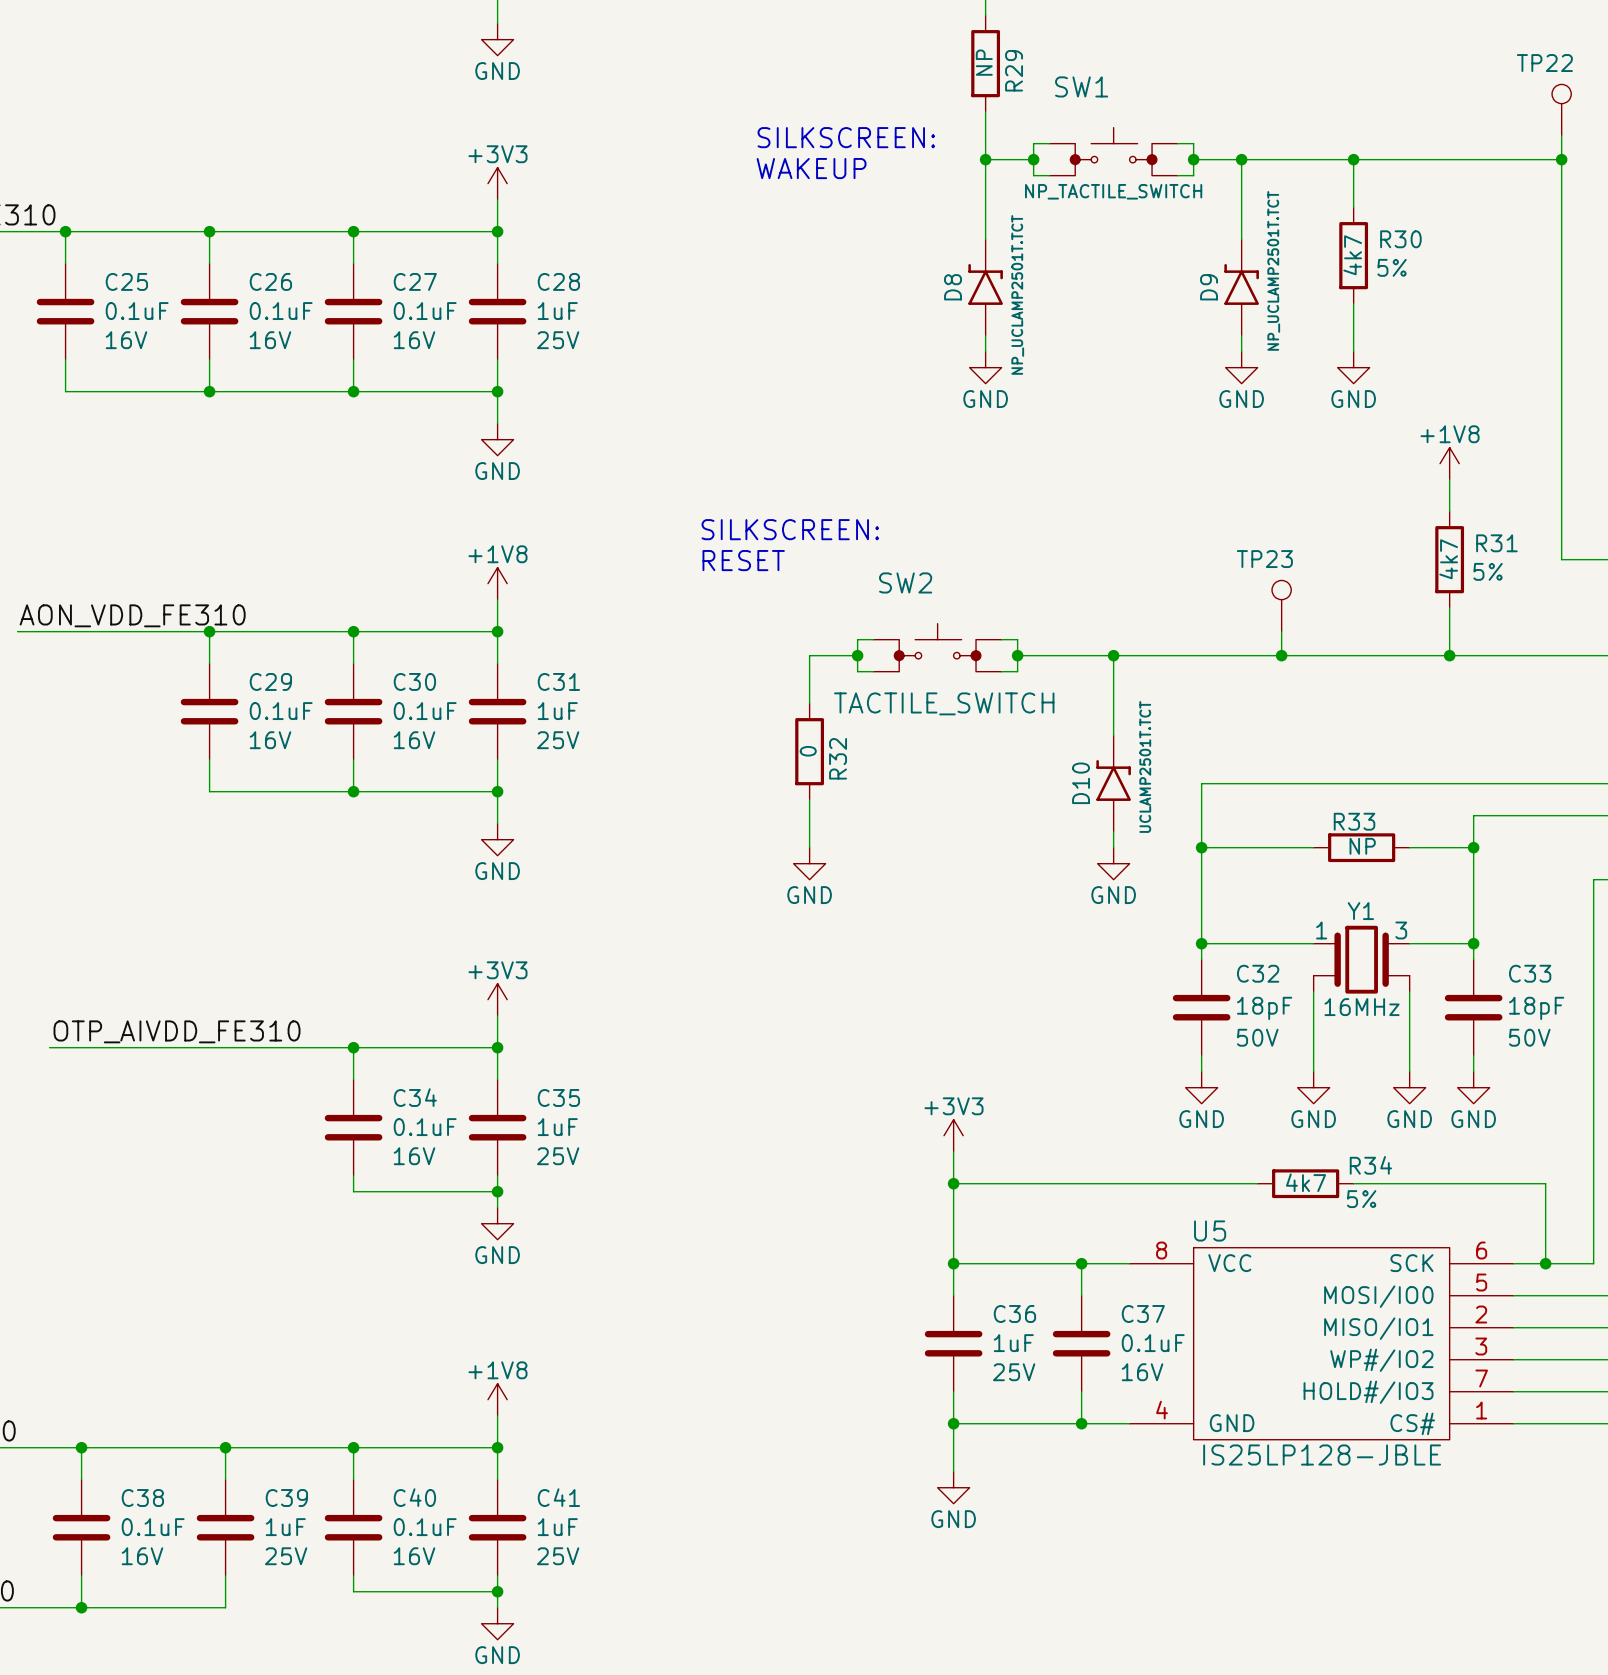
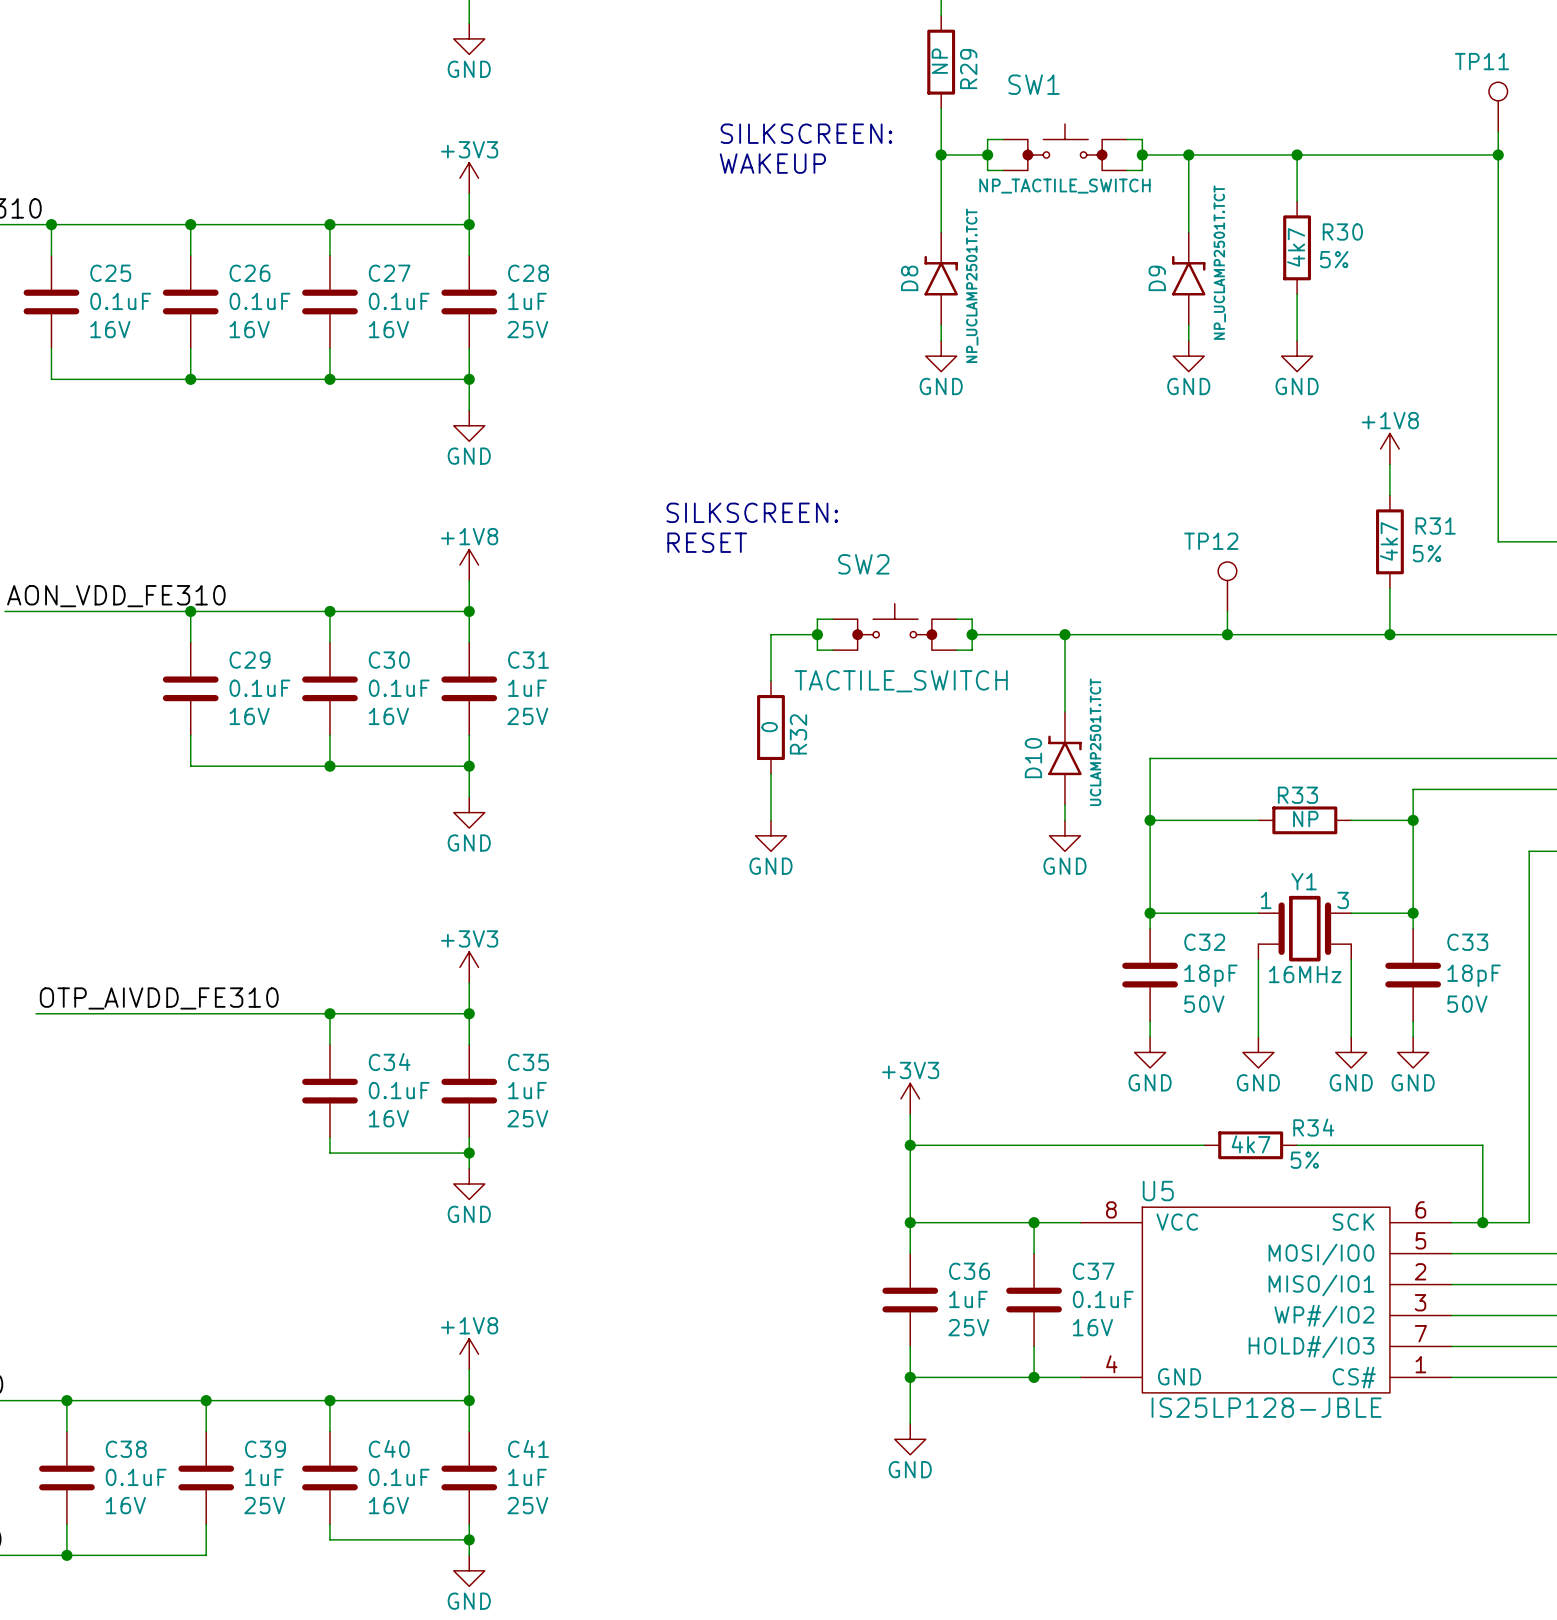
TP22 name: TP22 (1544, 63) -> TP11 (1482, 61)
TP23 name: TP23 (1264, 559) -> TP12 (1211, 541)

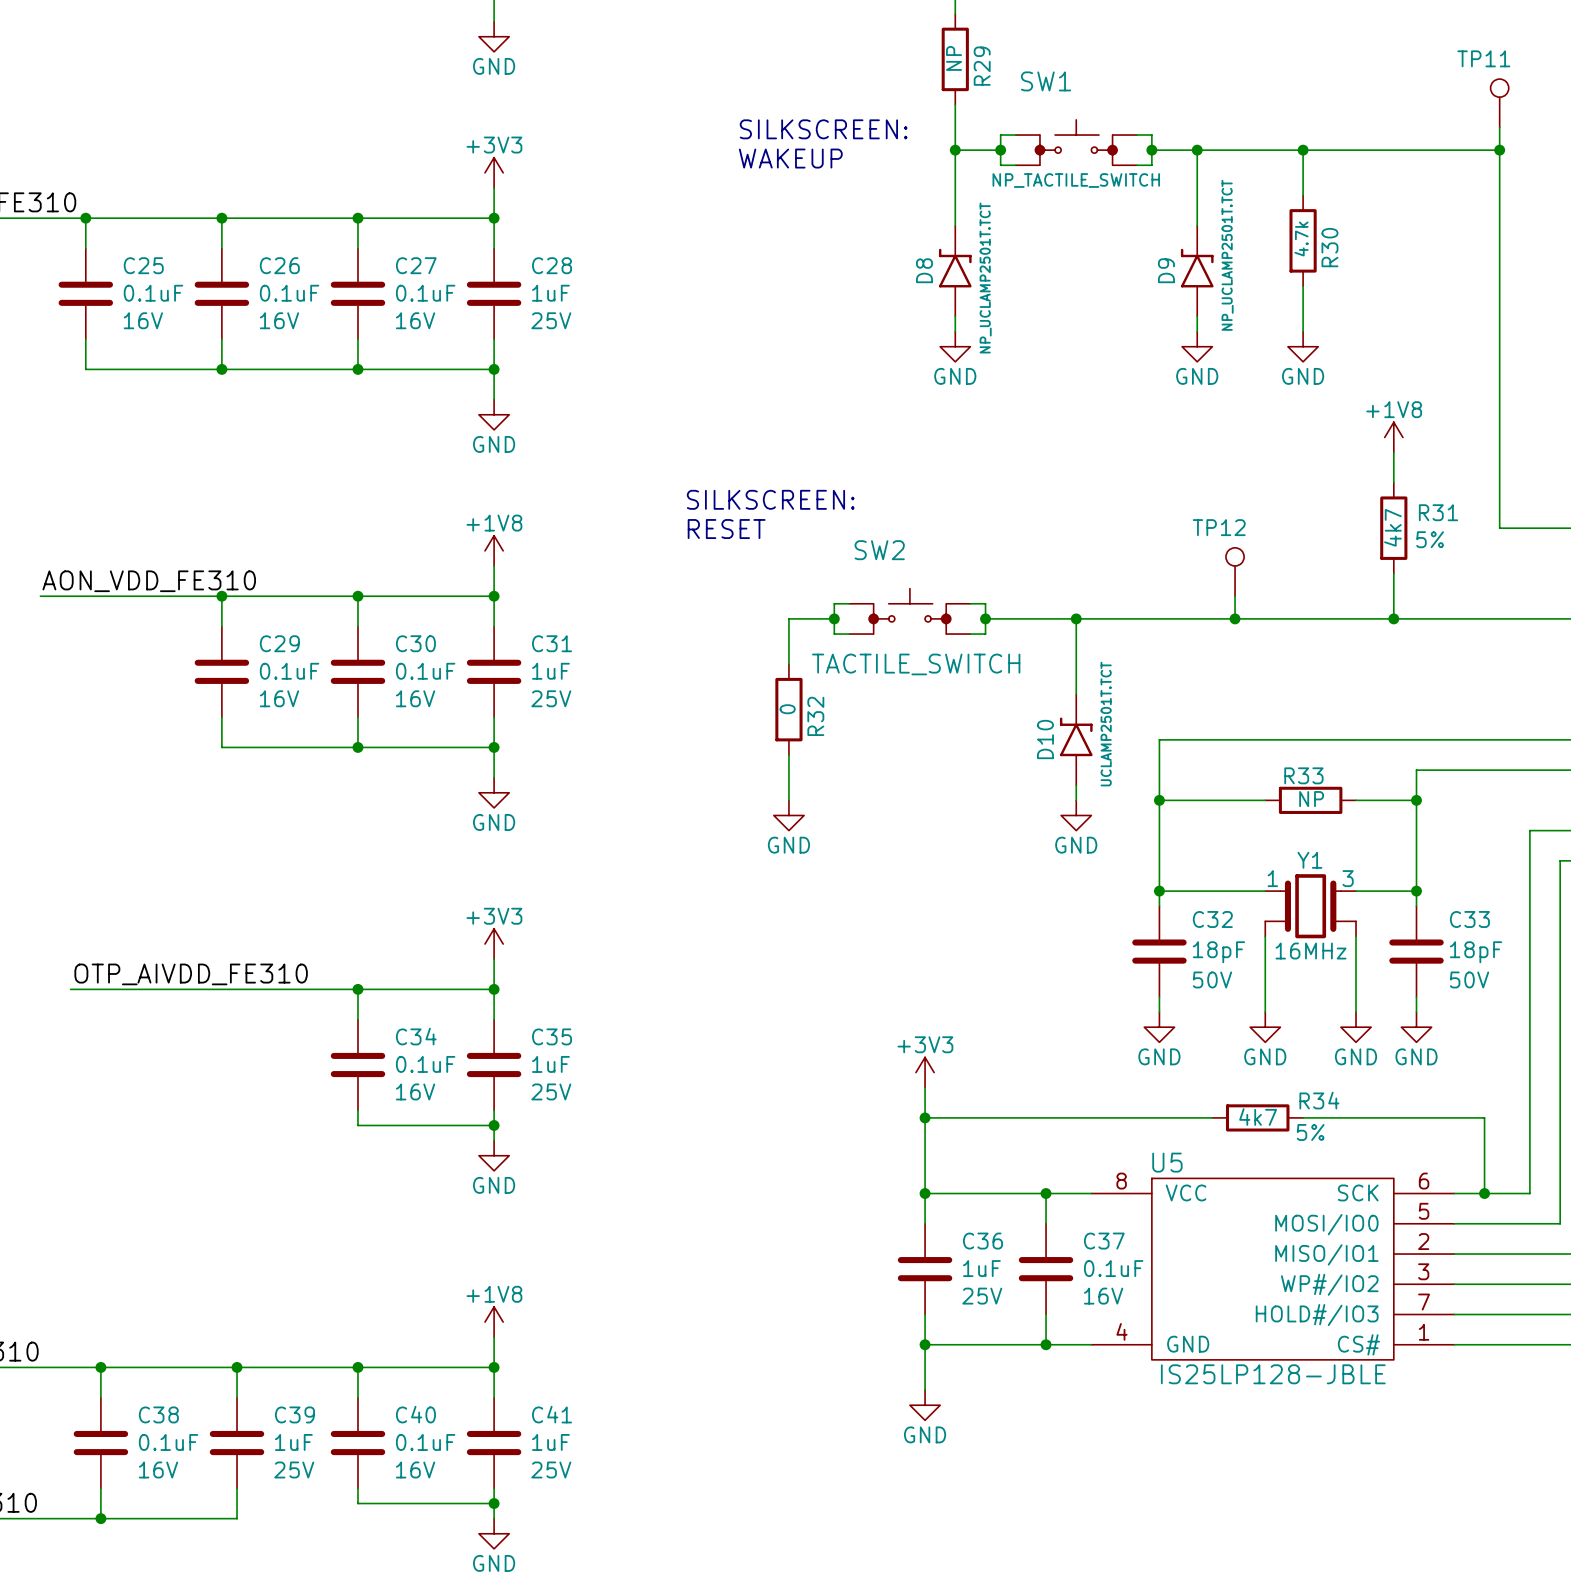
R30 name rotation: 0° (1342, 232) -> 90° counterclockwise (1329, 247)
R30 text: none -> 4.7k (1301, 239)
R30 text: 4k7 (1296, 247) -> none
R30 text: 5% (1334, 259) -> none

